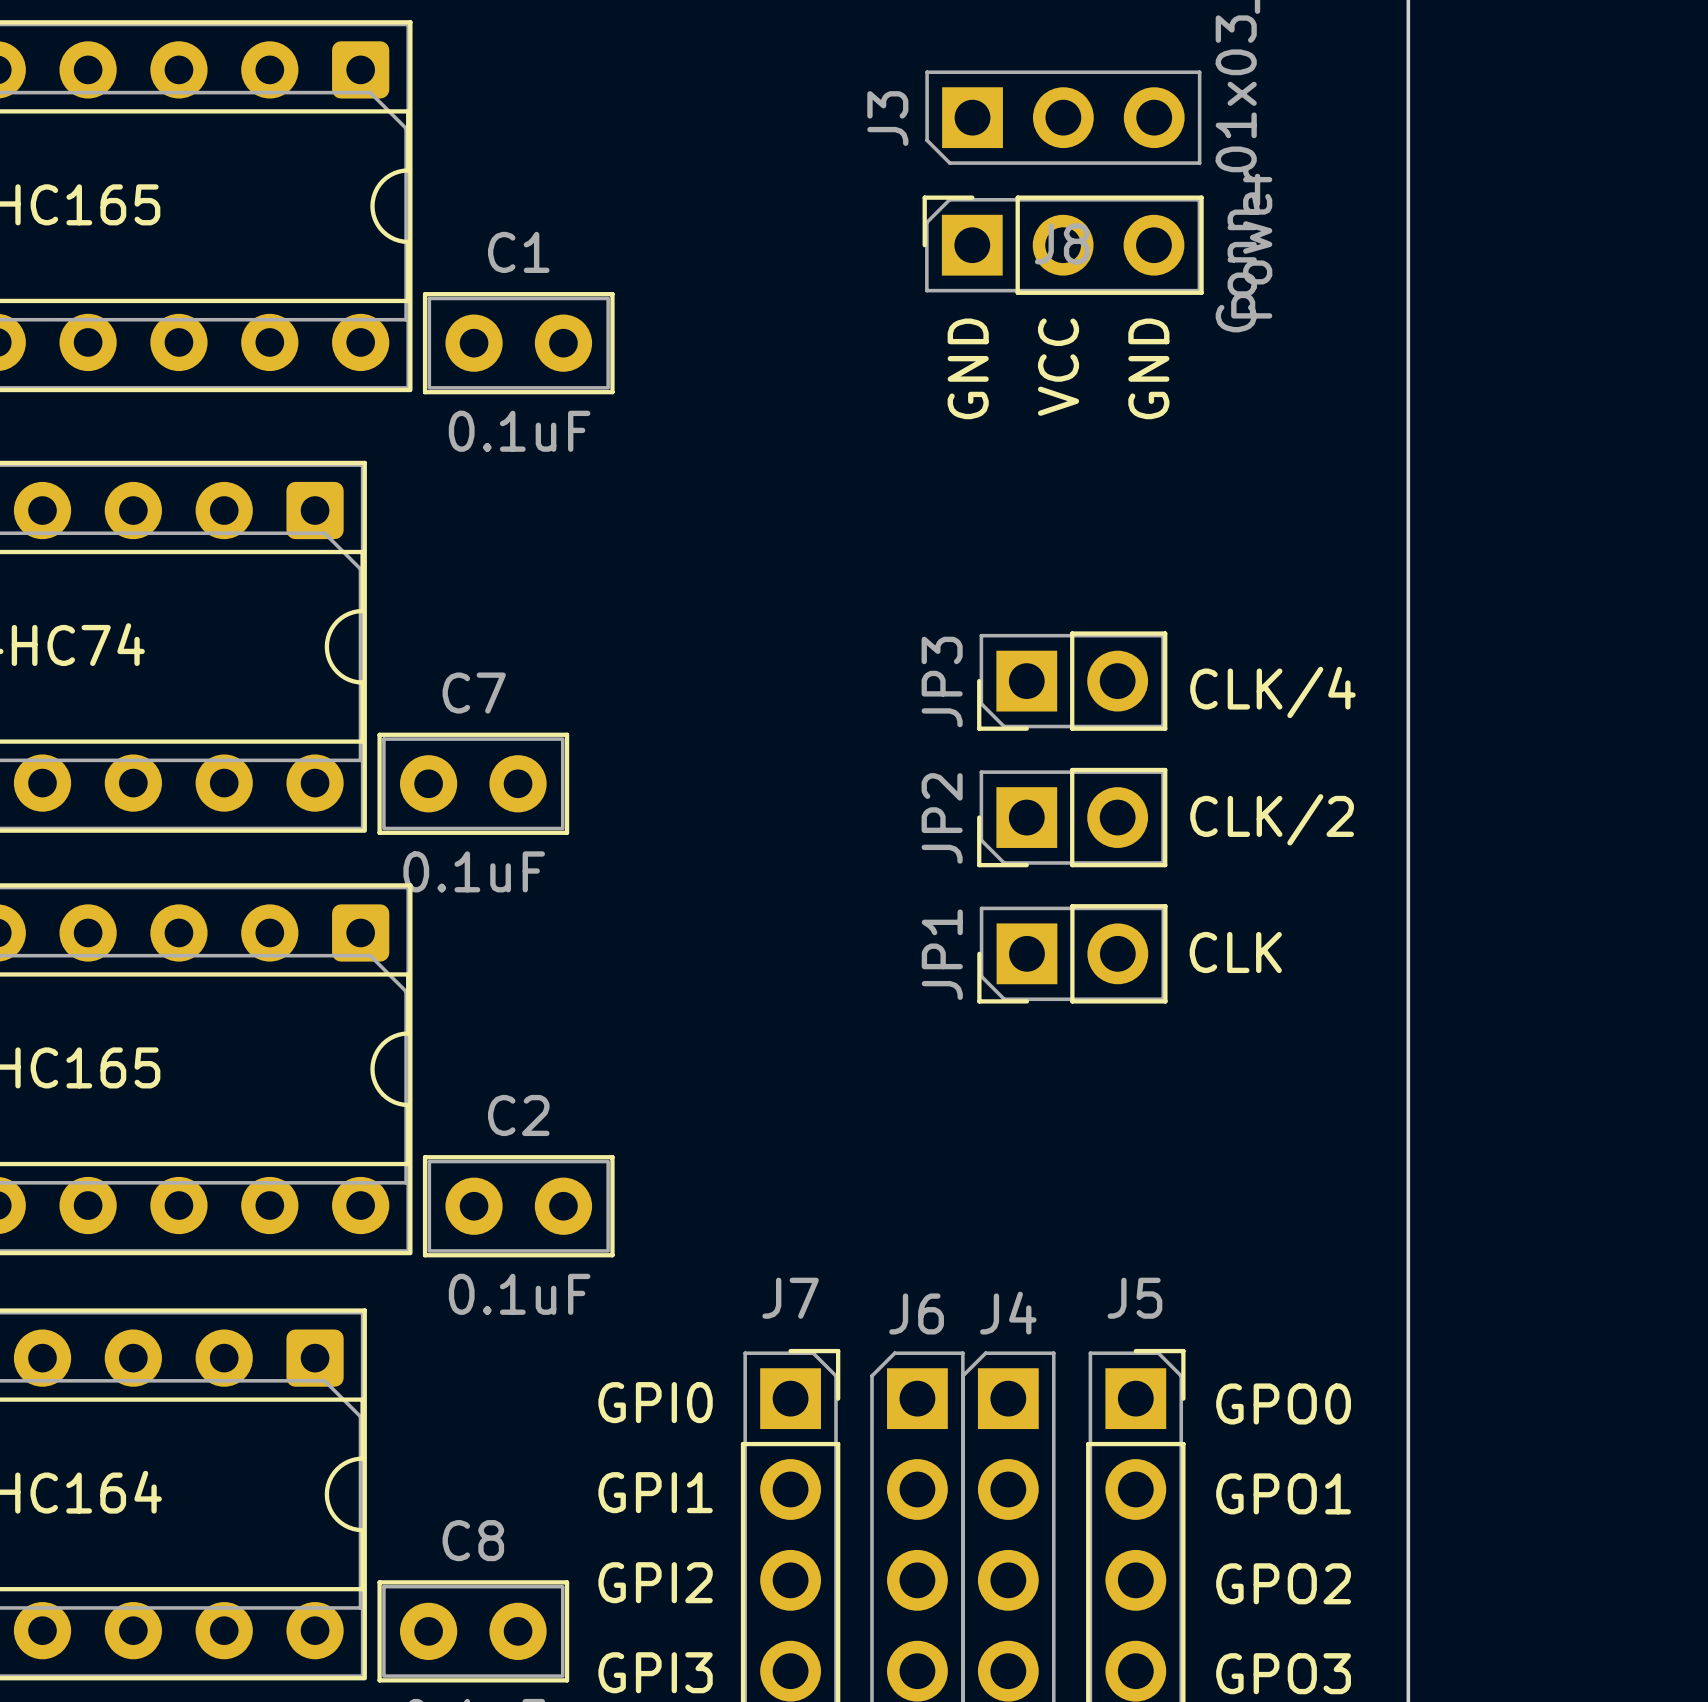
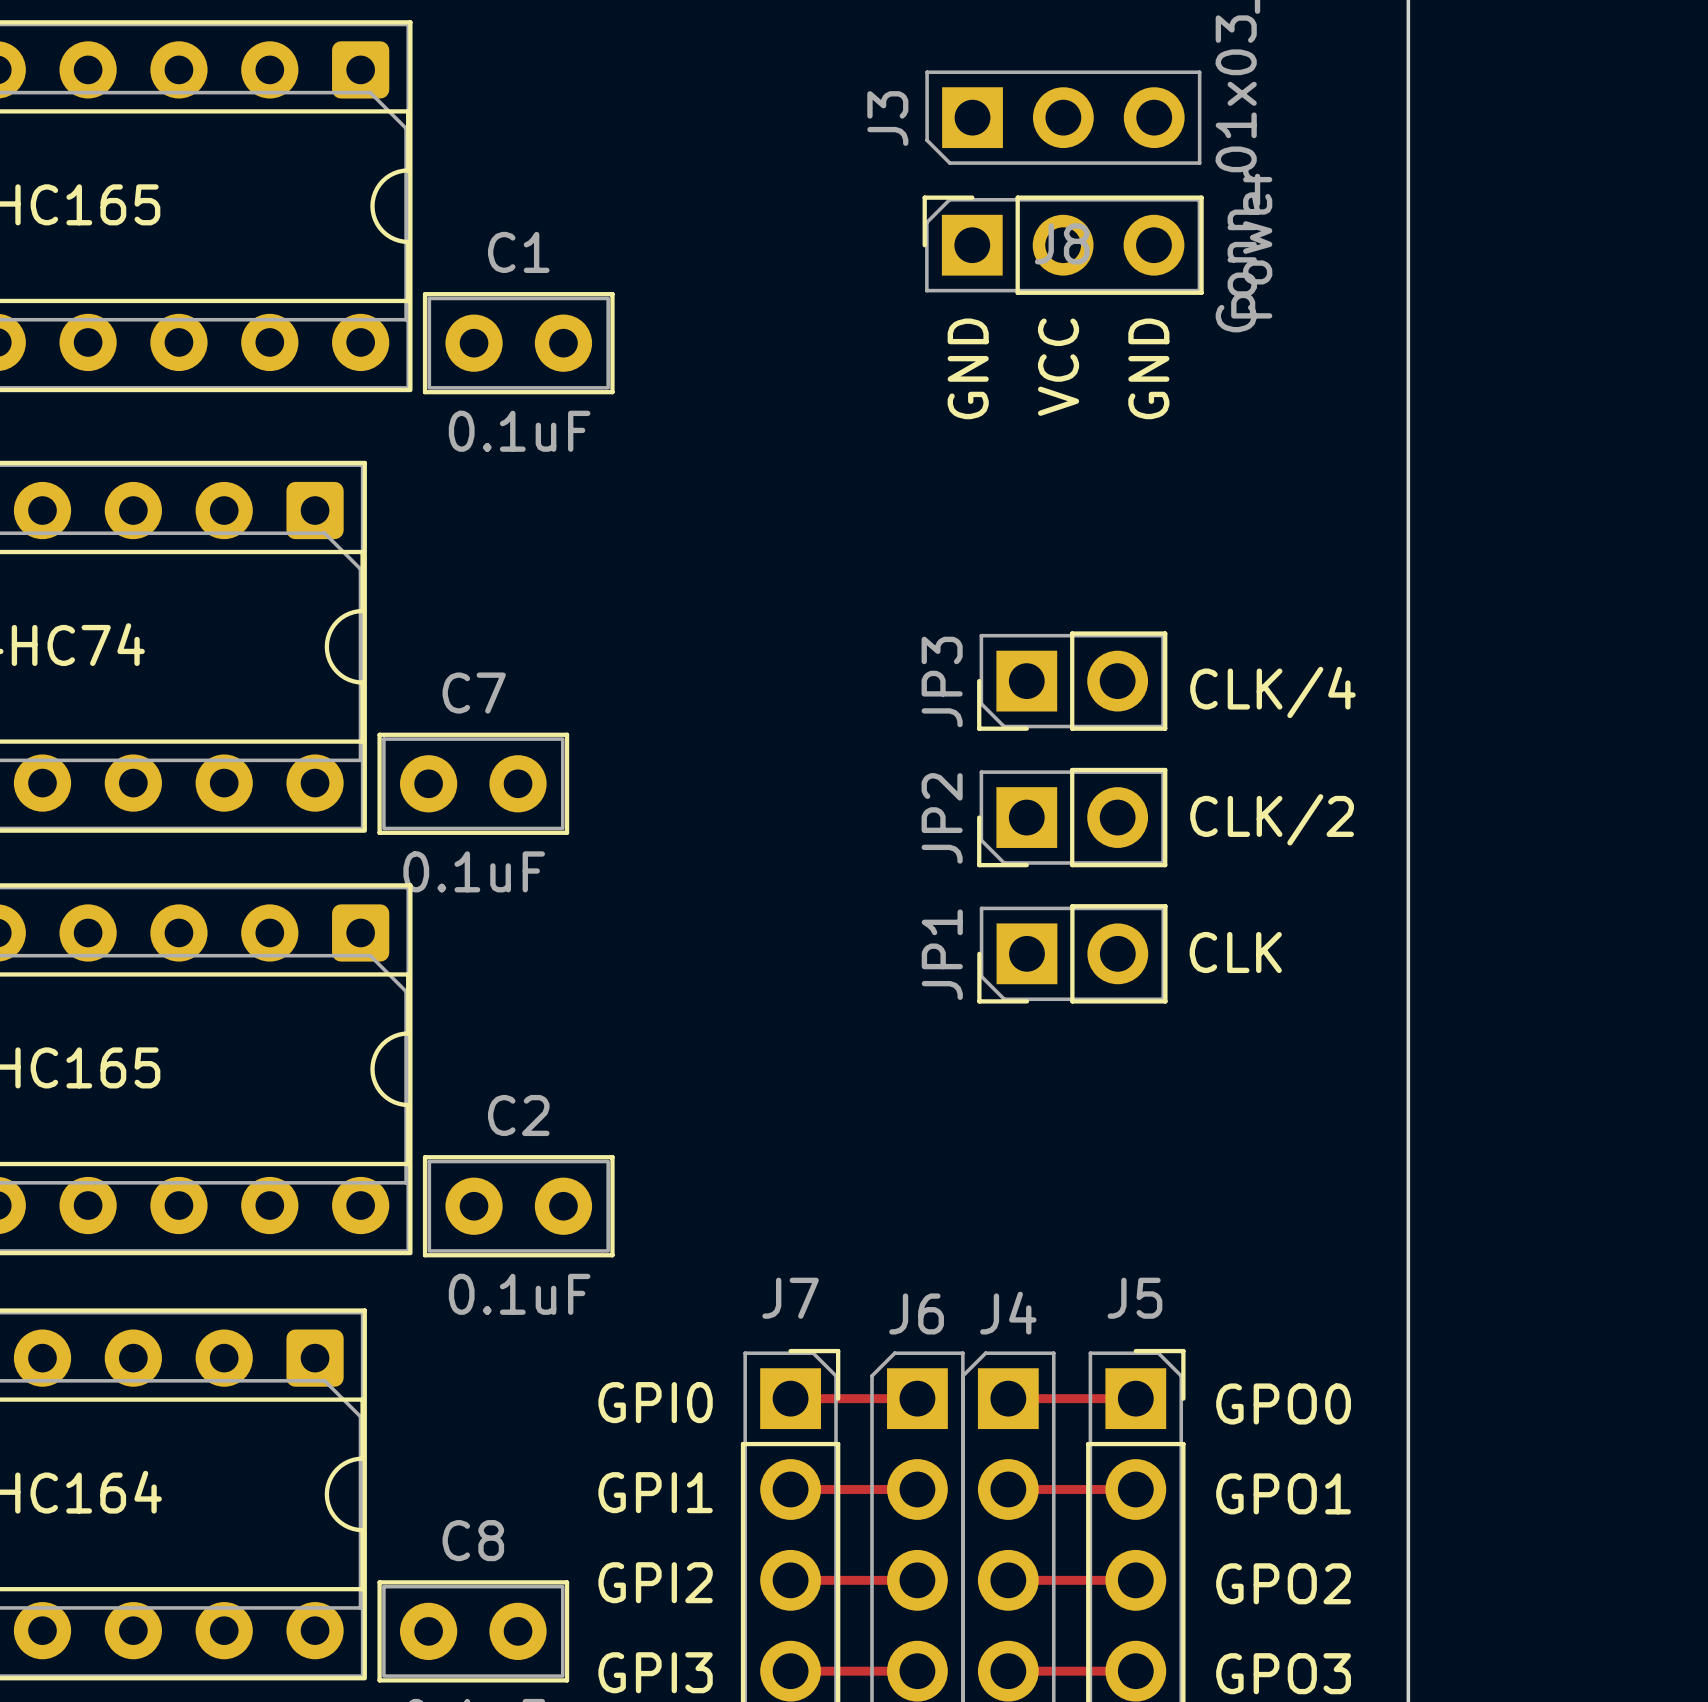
top track: none -> (790, 1398) (917, 1398)
top track: none -> (1008, 1398) (1135, 1398)
top track: none -> (790, 1489) (917, 1489)
top track: none -> (1008, 1489) (1135, 1489)
top track: none -> (790, 1580) (917, 1580)
top track: none -> (1008, 1580) (1135, 1580)
top track: none -> (790, 1671) (917, 1671)
top track: none -> (1008, 1671) (1135, 1671)

